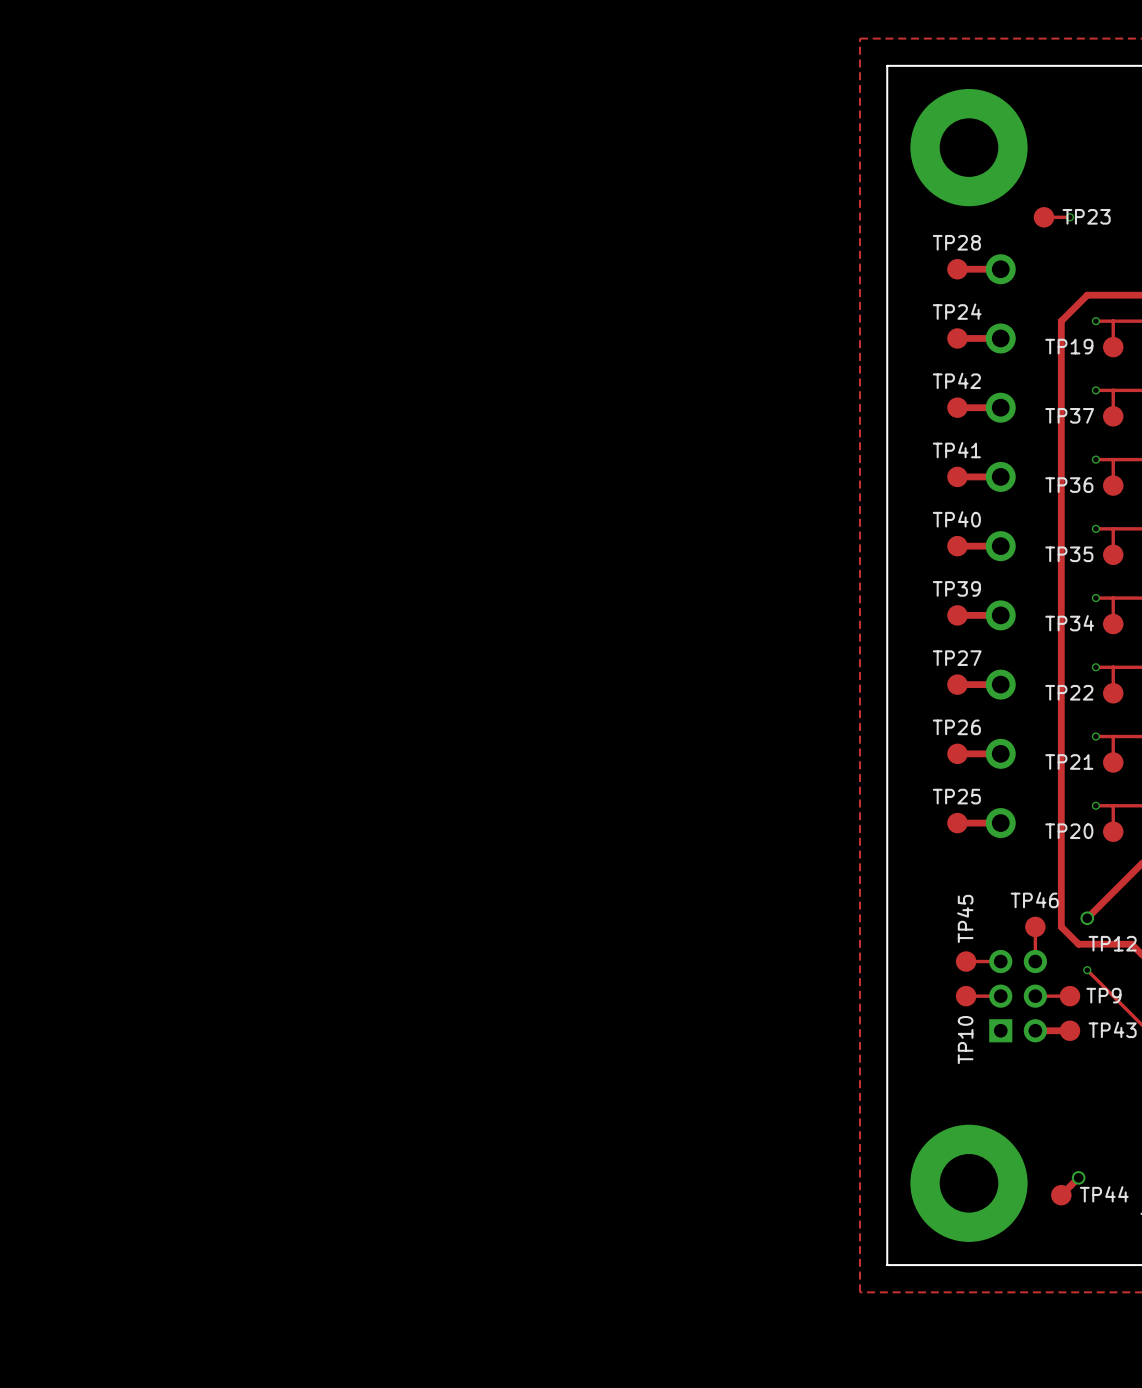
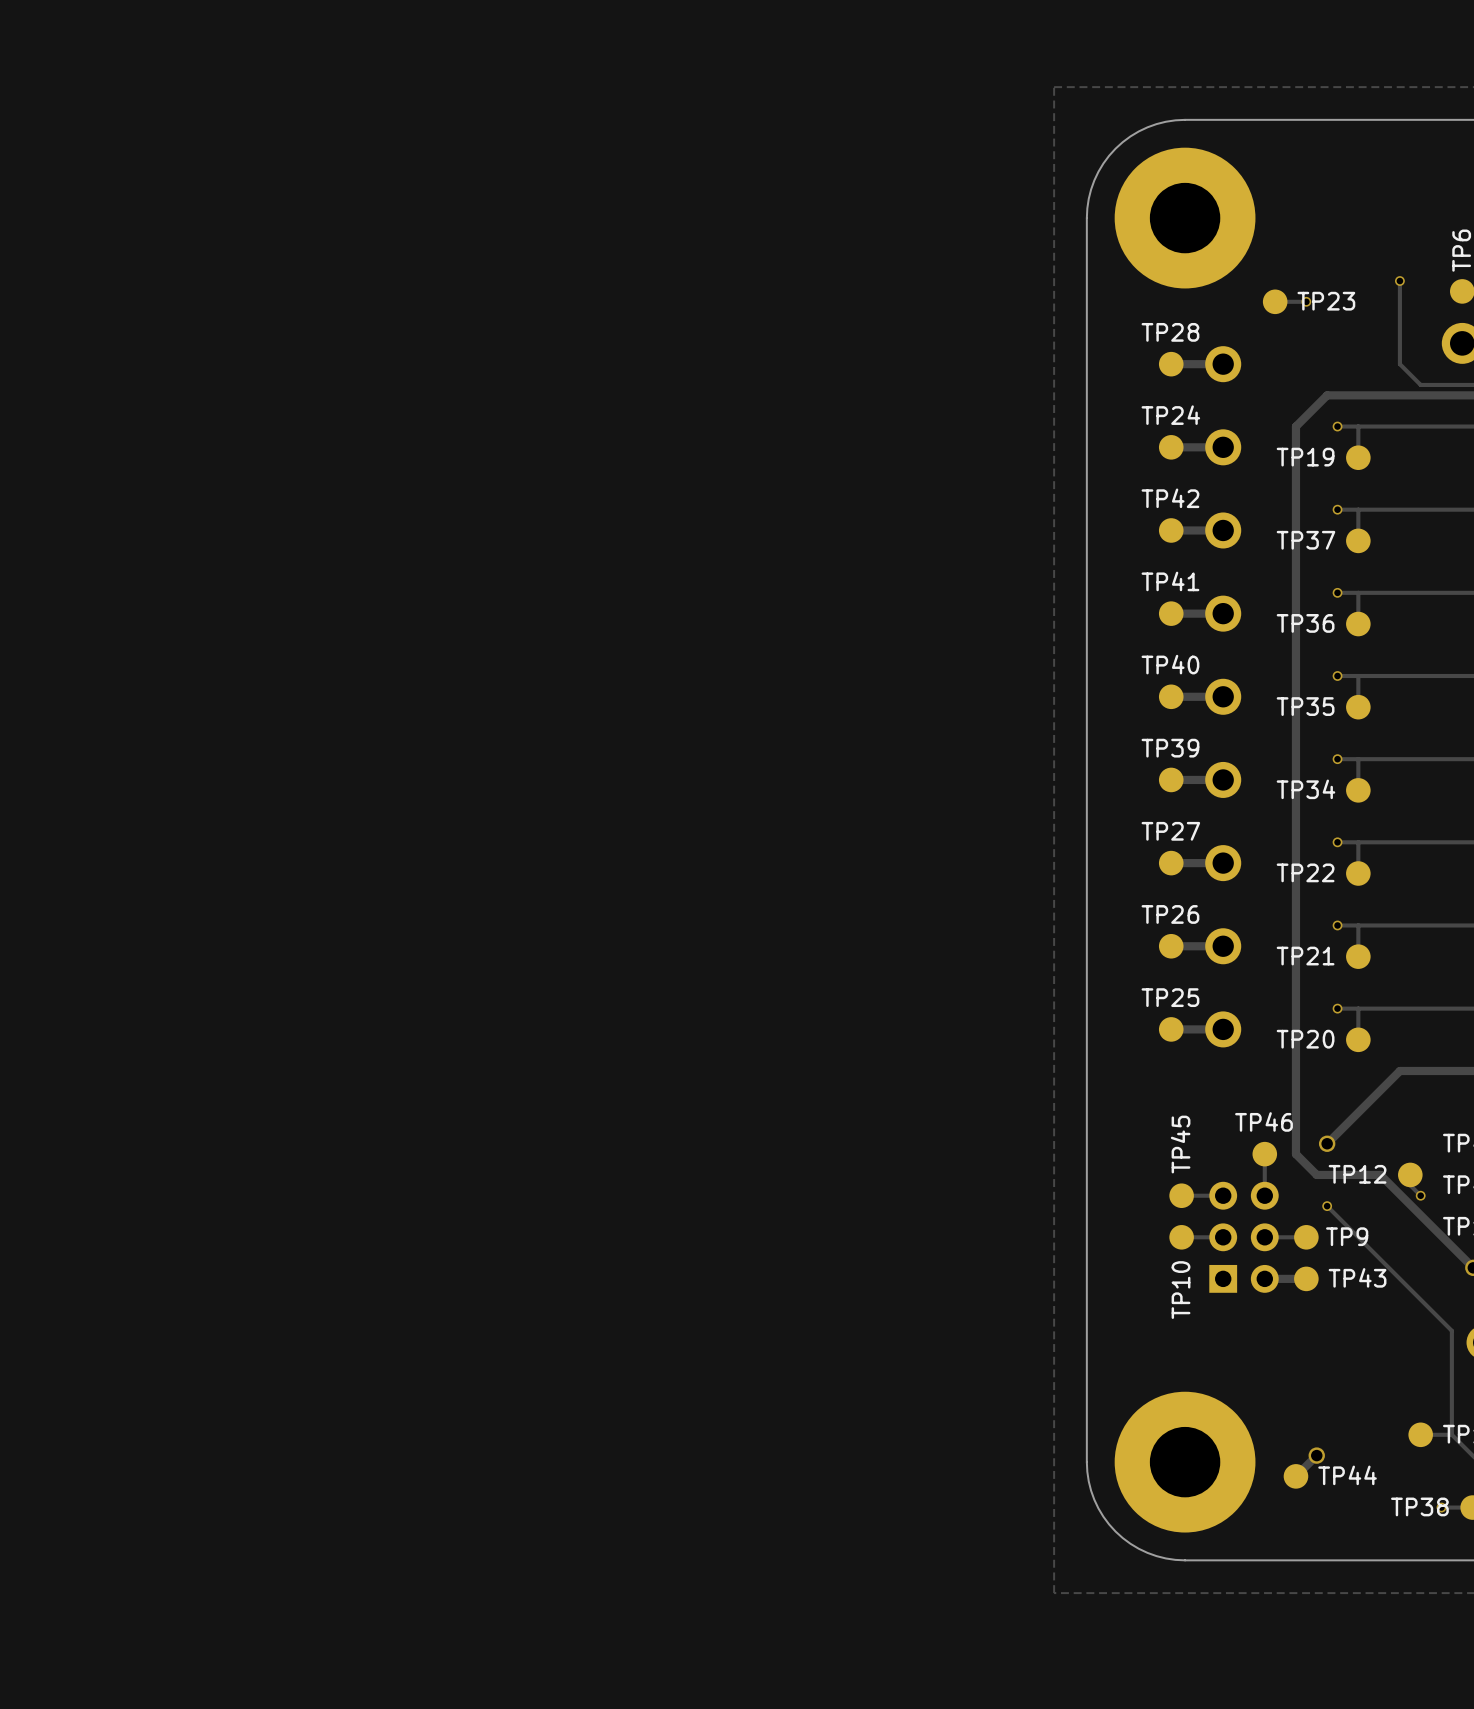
board edge: (969, 65) (887, 65) (887, 147) -> (1185, 119) (1165, 121) (1147, 127) (1130, 136) (1115, 148) (1103, 163) (1094, 180) (1088, 198) (1086, 218)
board edge: (887, 1183) (887, 1265) (969, 1265) -> (1086, 1462) (1088, 1481) (1094, 1499) (1103, 1516) (1115, 1531) (1130, 1543) (1147, 1552) (1165, 1558) (1185, 1560)

